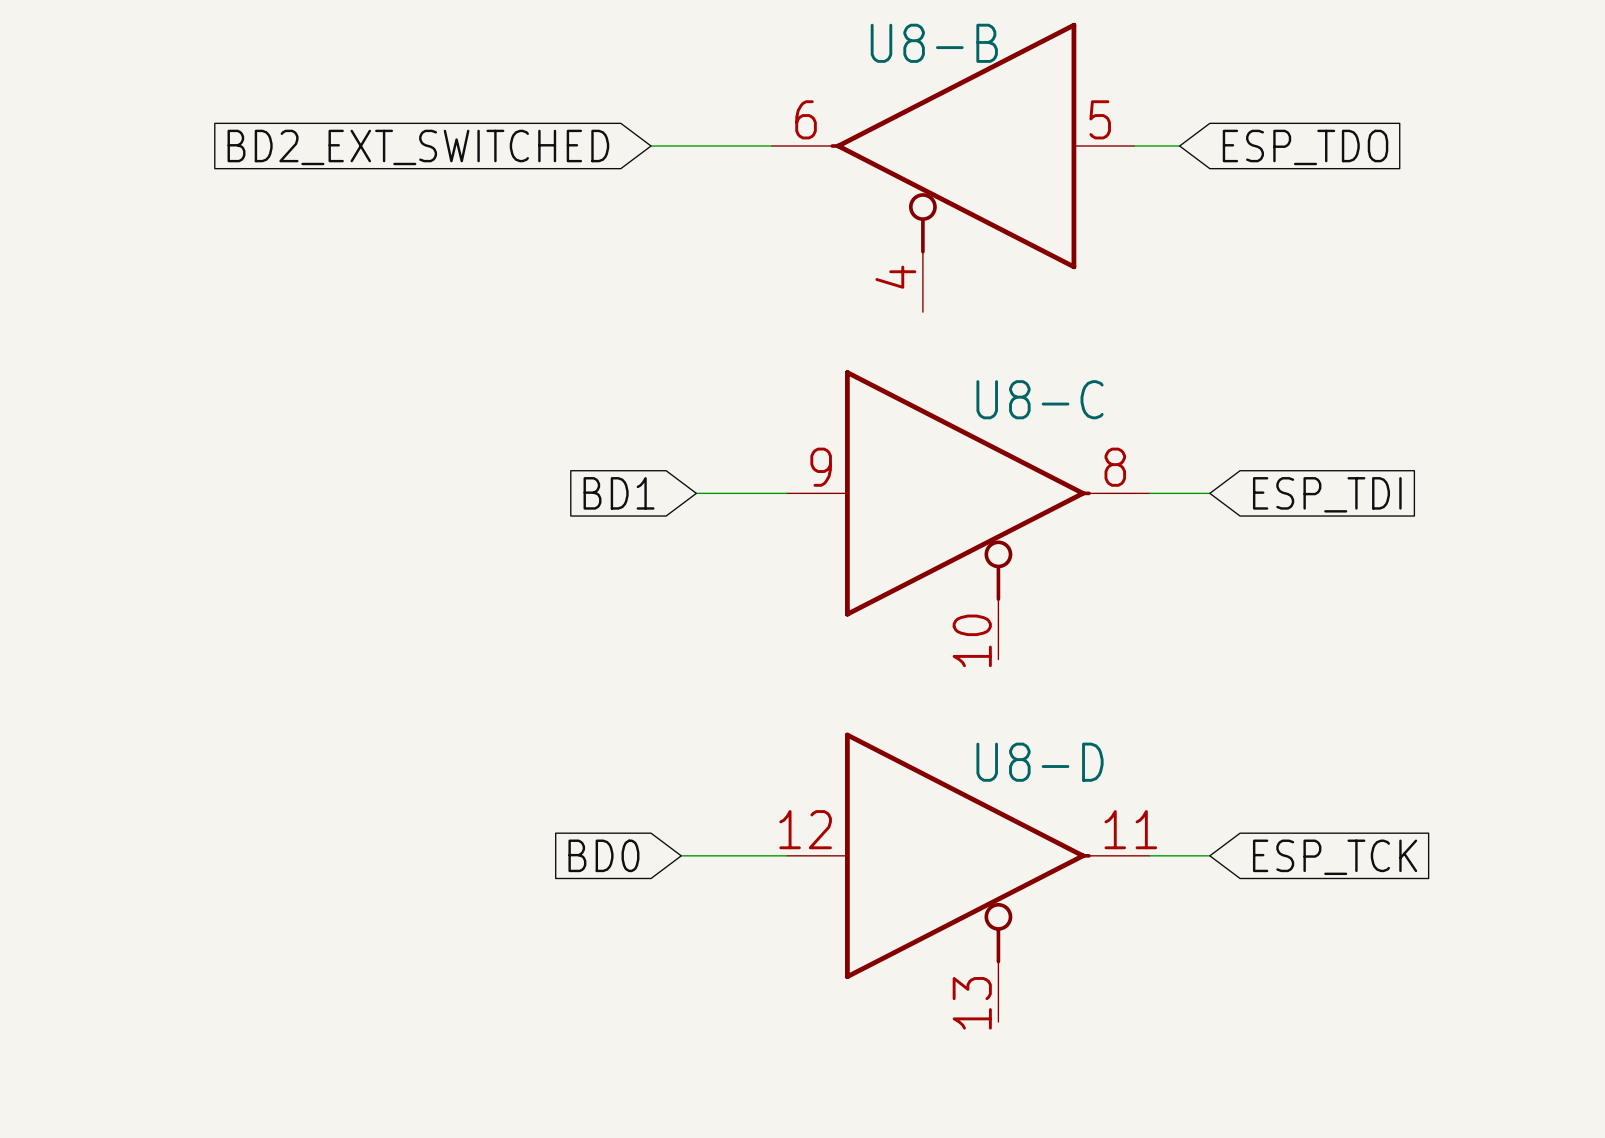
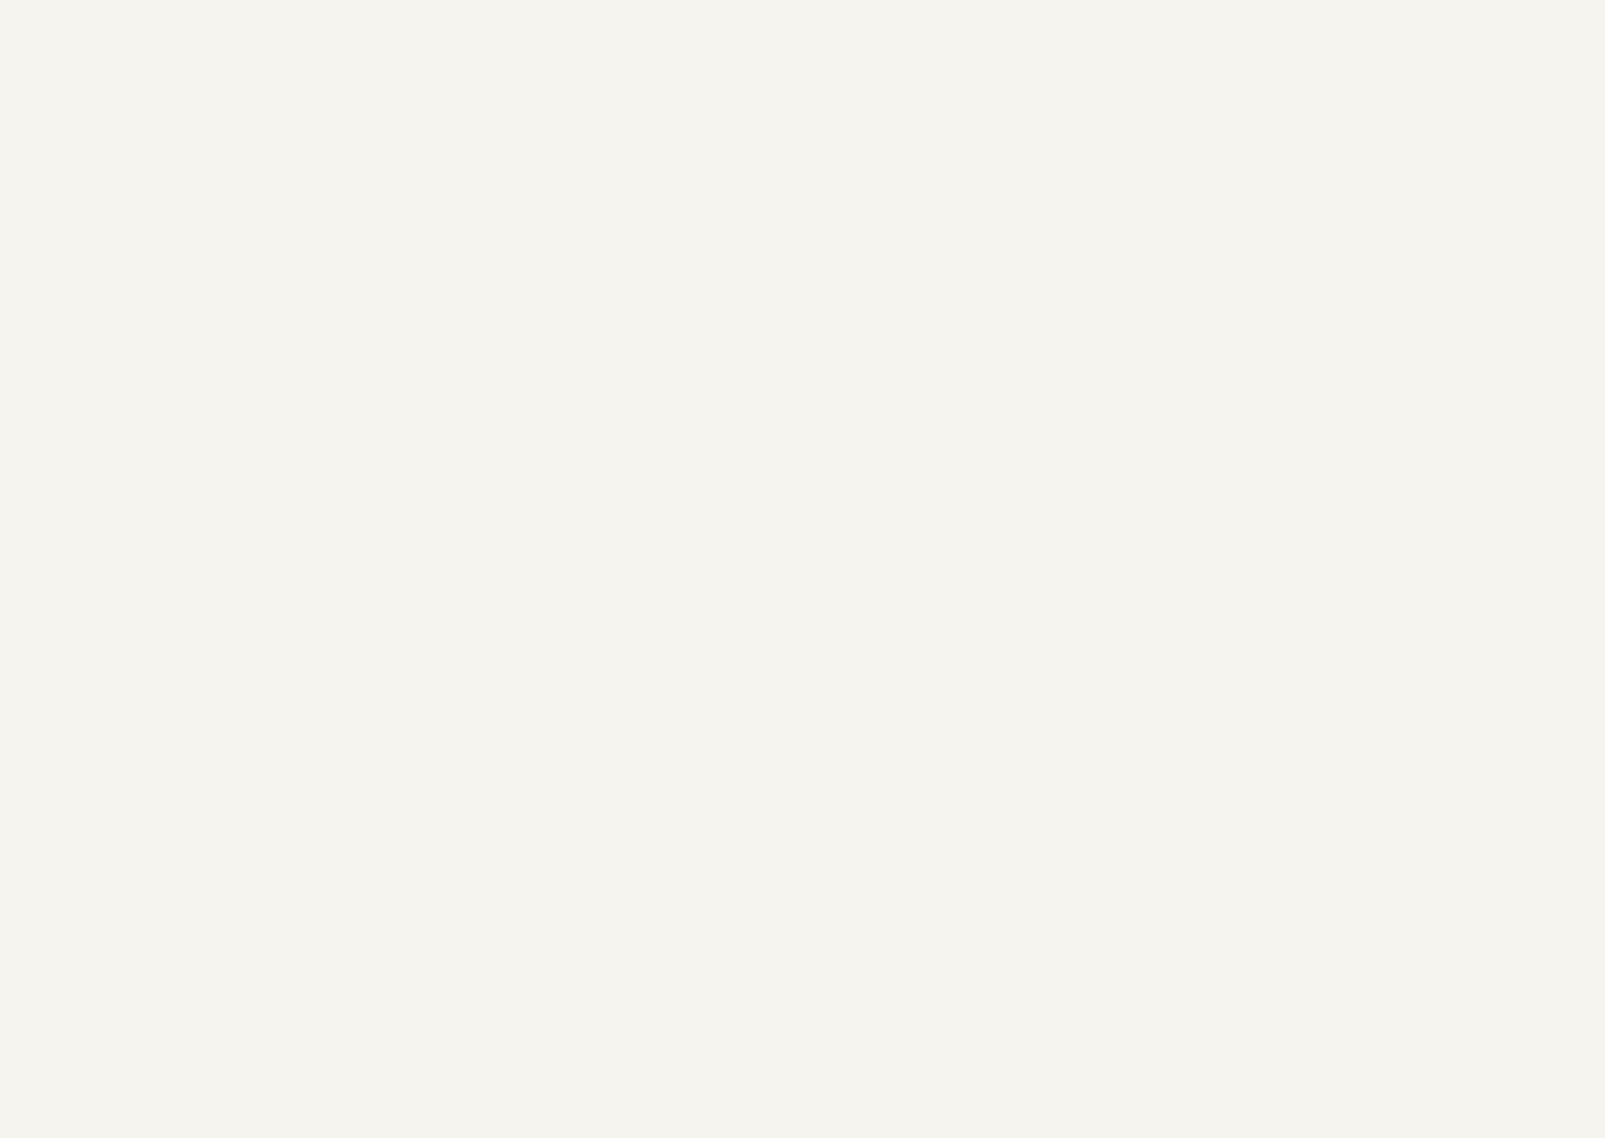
wire: (651, 146) (771, 146) -> none
wire: (1134, 146) (1179, 146) -> none
global label: BD2_EXT_SWITCHED (418, 147) -> none
global label: ESP_TDO (1305, 147) -> none
U8-B: (953, 167) -> none
global label: BD1 (619, 493) -> none
wire: (696, 493) (786, 493) -> none
wire: (1149, 493) (1209, 493) -> none
global label: ESP_TDI (1327, 494) -> none
U8-C: (968, 514) -> none
global label: BD0 (603, 855) -> none
wire: (681, 855) (786, 855) -> none
wire: (1149, 855) (1209, 855) -> none
global label: ESP_TCK (1335, 857) -> none
U8-D: (968, 877) -> none

